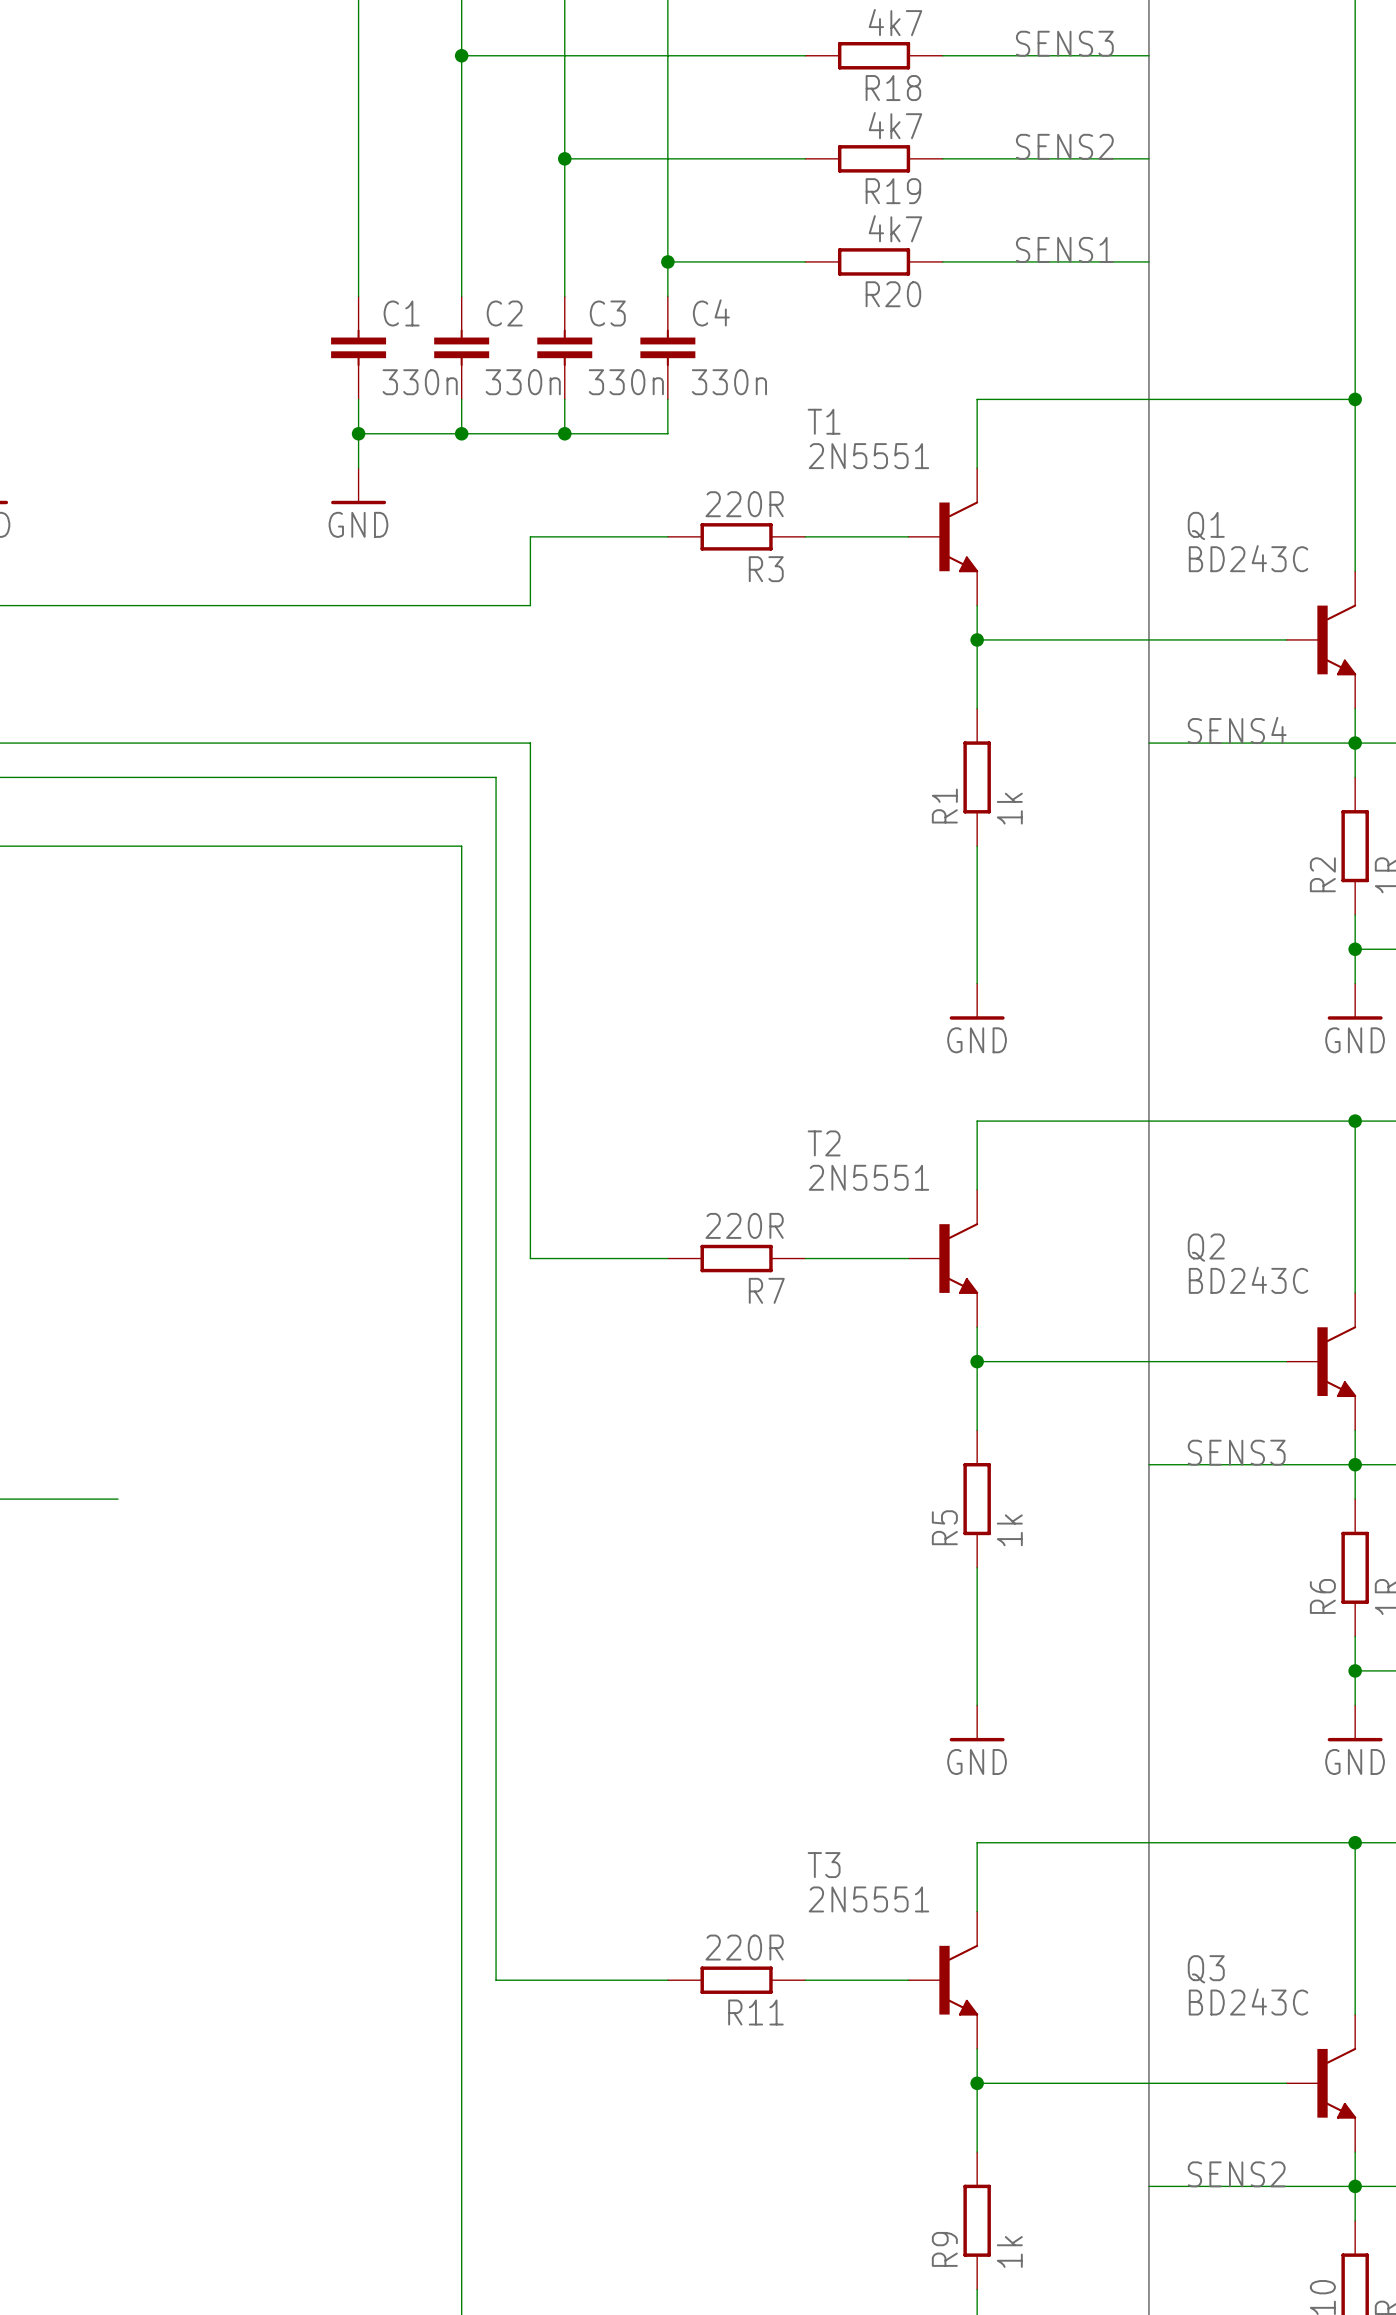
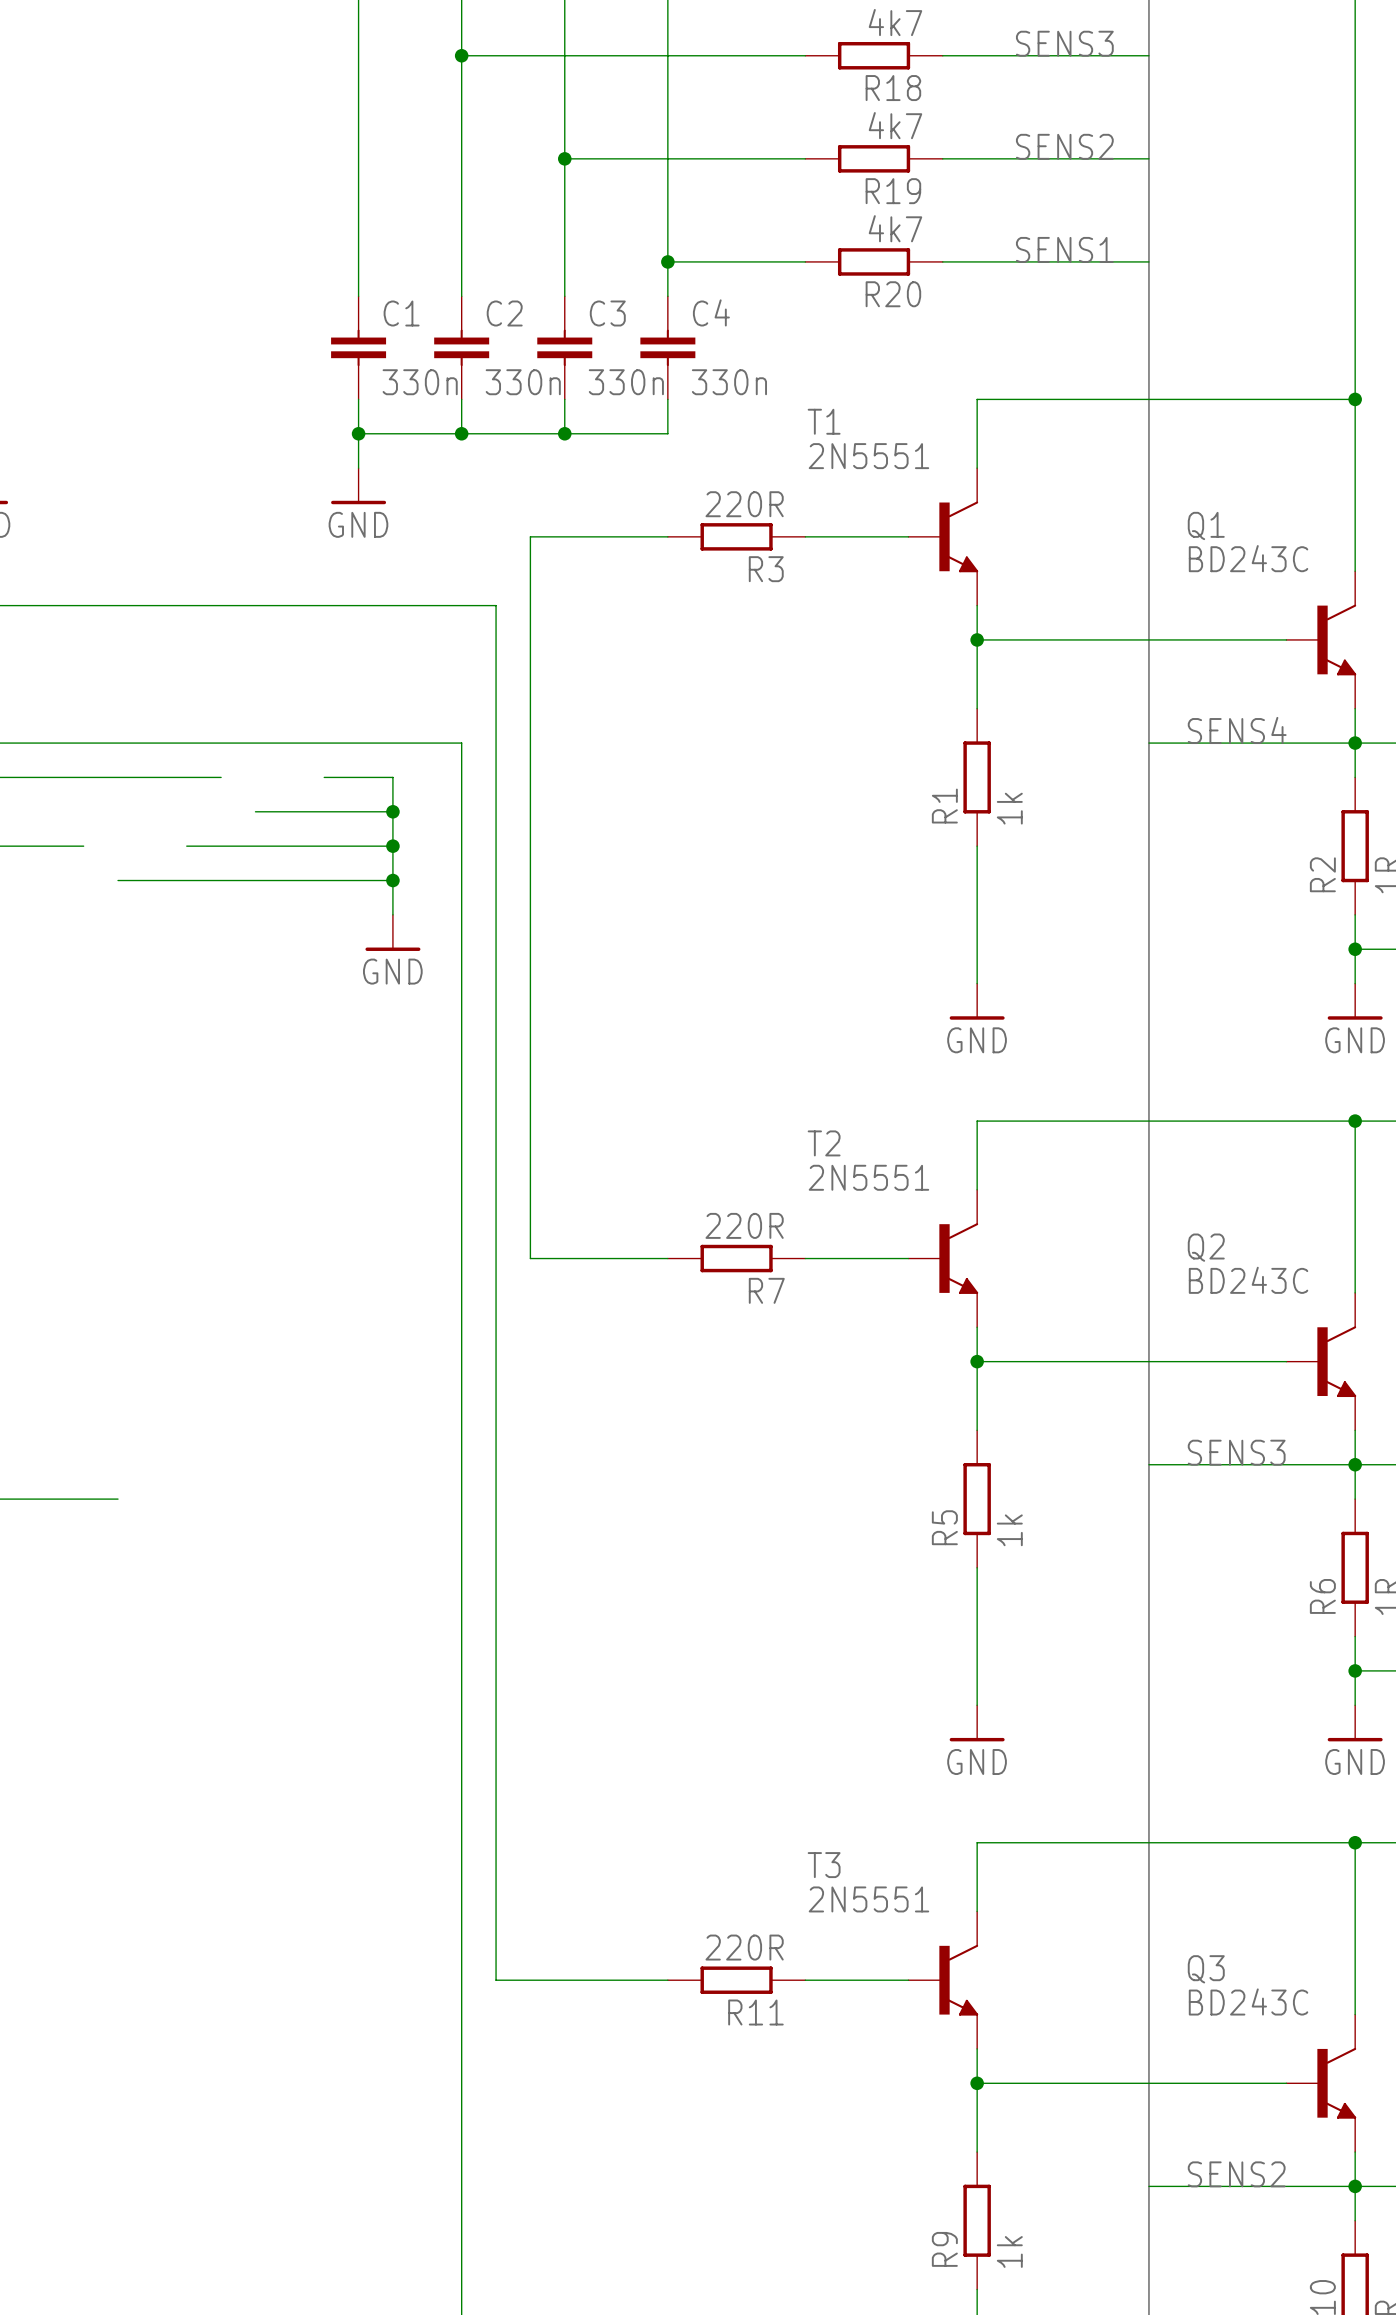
wire: (496, 605) (530, 605) -> (530, 743) (530, 605)
wire: none -> (496, 605) (496, 777)
wire: (461, 743) (530, 743) -> (461, 743) (461, 846)
wire: (221, 777) (324, 777) -> none
wire: (392, 777) (496, 777) -> (392, 777) (392, 914)
wire: none -> (255, 811) (392, 811)
junction: none -> (392, 811)
wire: (83, 846) (186, 846) -> none
wire: (392, 846) (461, 846) -> none
junction: none -> (392, 846)
wire: none -> (118, 880) (392, 880)
junction: none -> (392, 880)
power symbol: none -> GND (392, 932)

